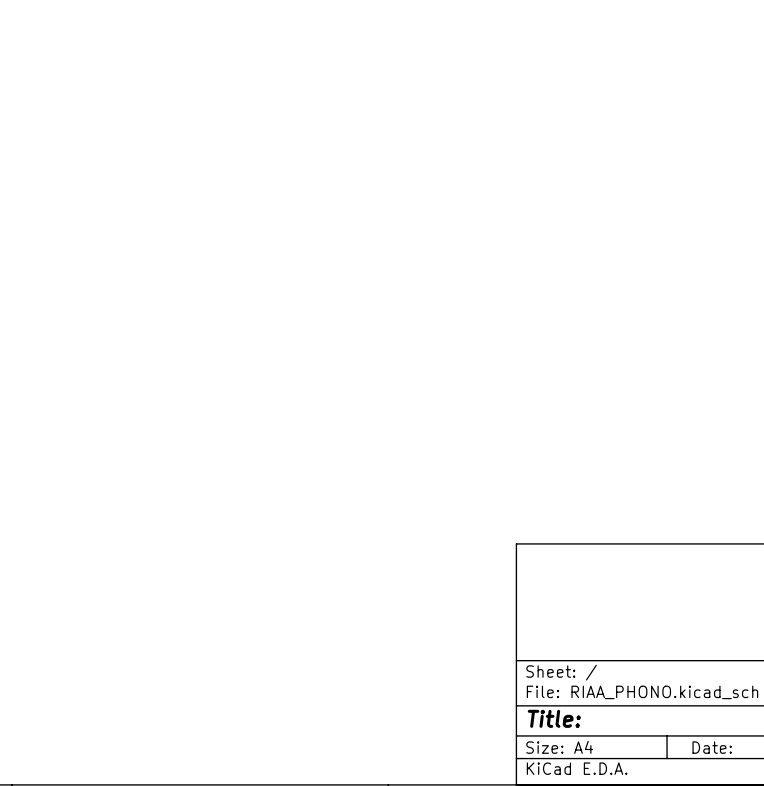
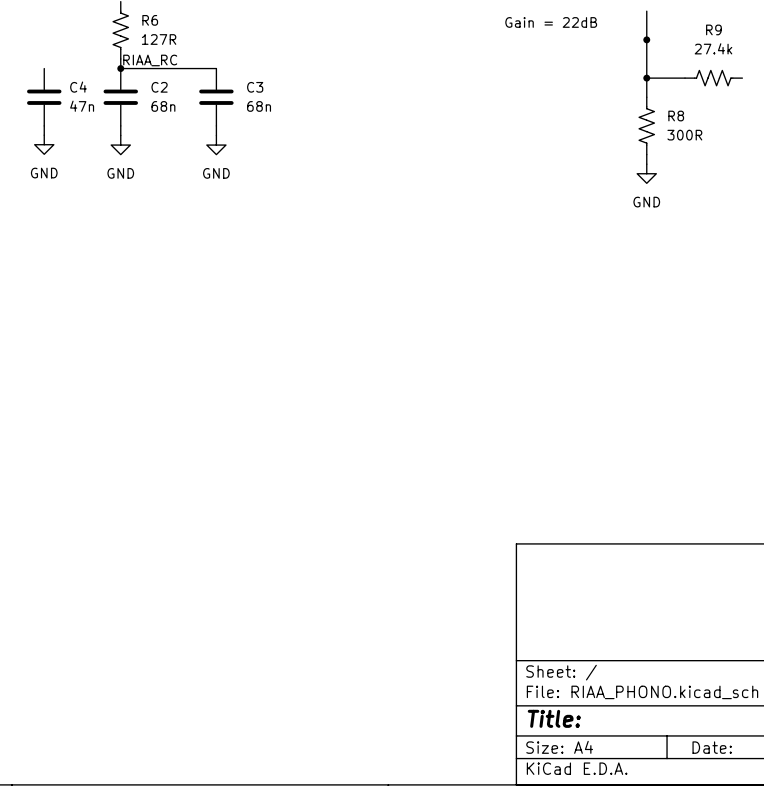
wire: none -> (646, 11) (646, 97)
text: none -> Gain = 22dB (551, 22)
R6: none -> 127R (120, 30)
junction: none -> (646, 39)
wire: none -> (120, 58) (120, 68) (216, 68)
label: none -> RIAA_RC (150, 60)
junction: none -> (120, 68)
wire: none -> (646, 78) (685, 78)
junction: none -> (646, 78)
R9: none -> 27.4k (713, 78)
C4: none -> 47n (44, 97)
C2: none -> 68n (120, 97)
C3: none -> 68n (216, 97)
wire: none -> (44, 125) (44, 135)
wire: none -> (120, 125) (120, 135)
wire: none -> (216, 125) (216, 135)
R8: none -> 300R (646, 125)
power symbol: none -> GND (44, 144)
power symbol: none -> GND (120, 145)
power symbol: none -> GND (216, 145)
wire: none -> (646, 154) (646, 164)
power symbol: none -> GND (646, 173)

